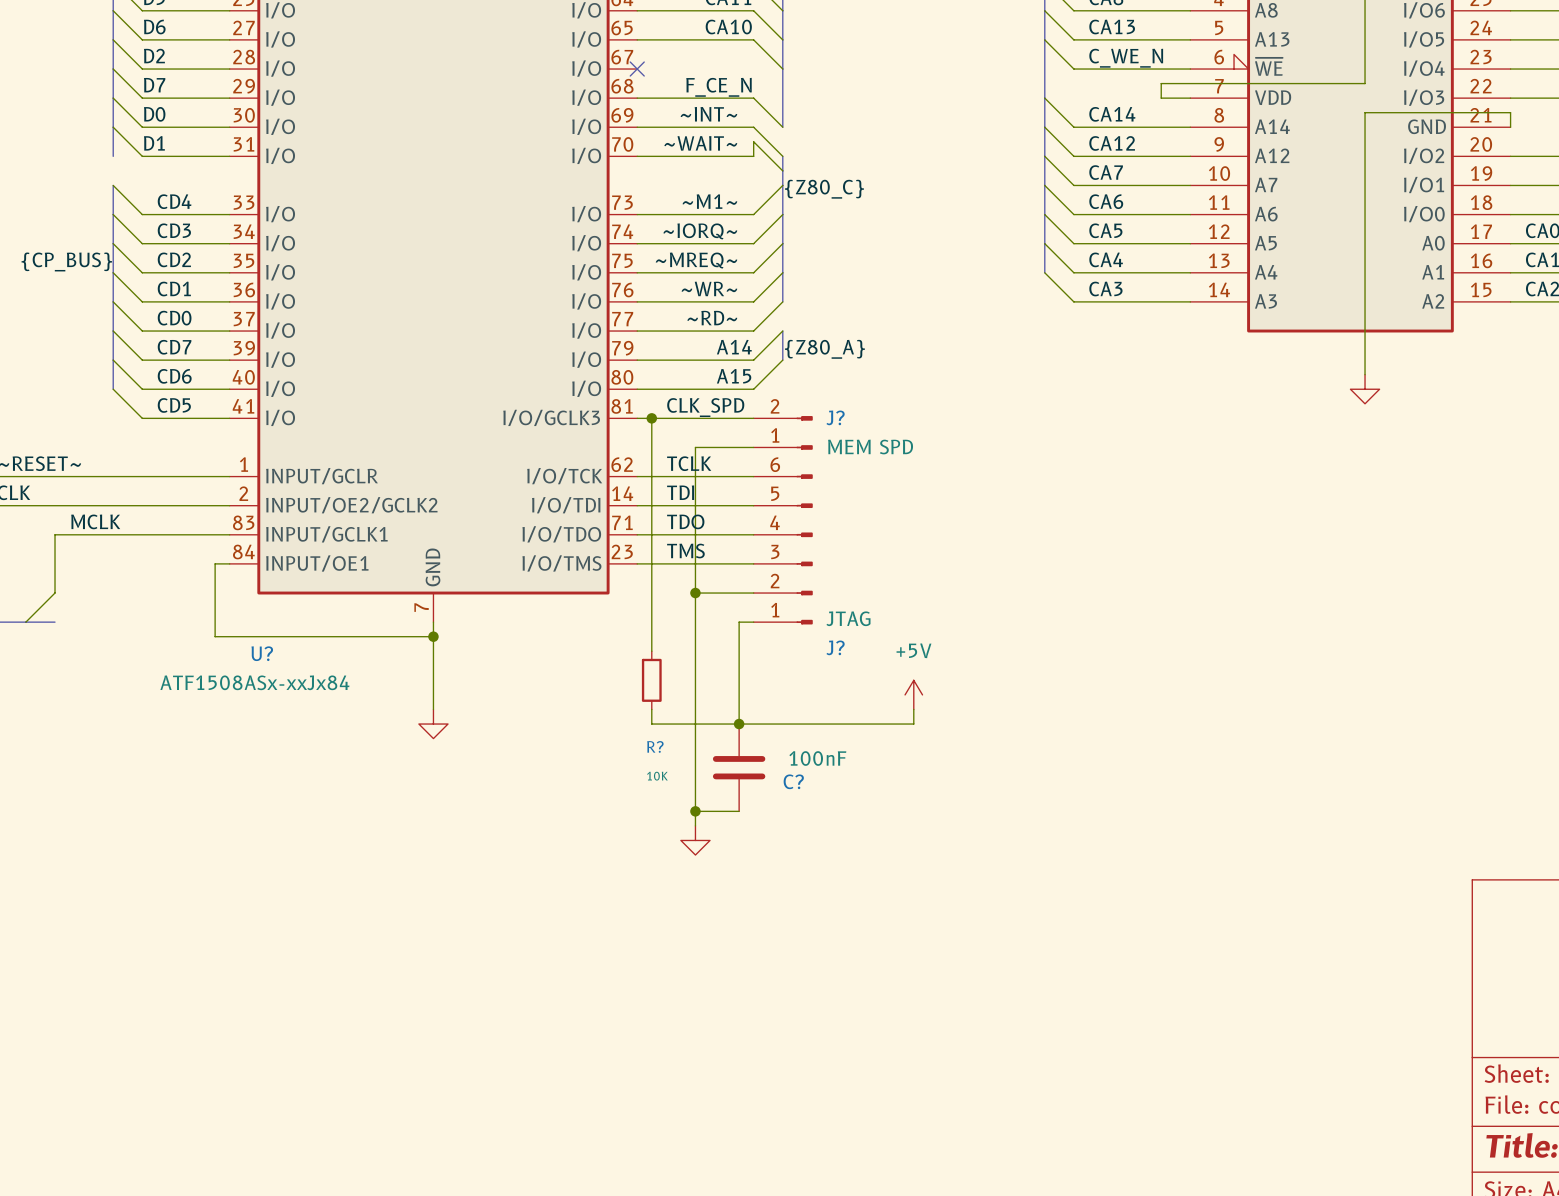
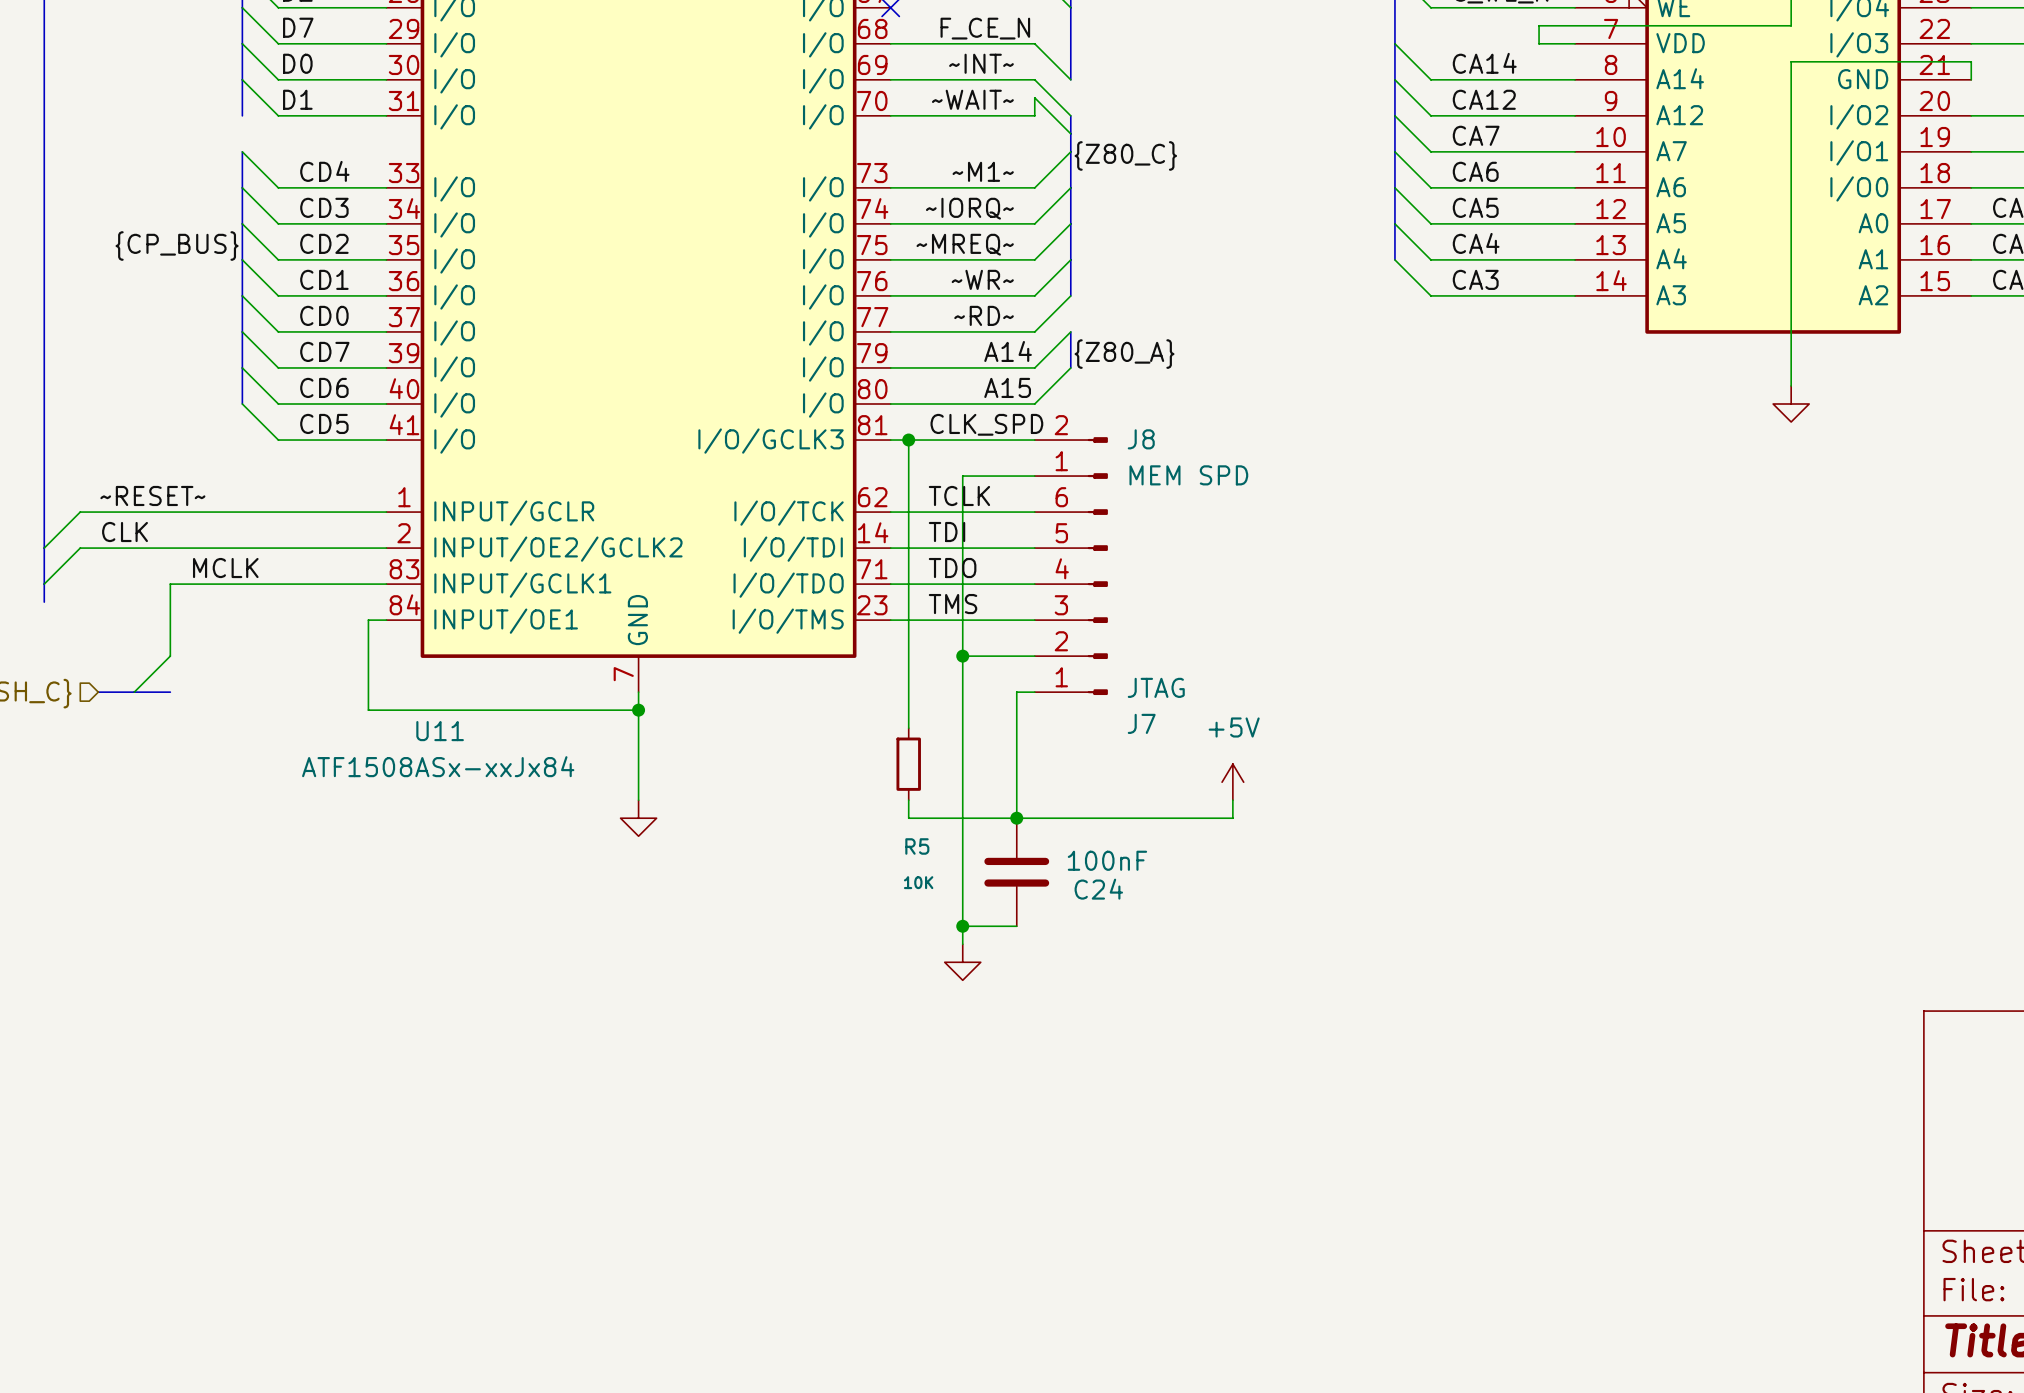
J? name: J? (835, 417) -> J8 (1141, 439)
J? name: J? (835, 647) -> J7 (1141, 723)
U? name: U? (262, 653) -> U11 (440, 731)
R? name: R? (655, 746) -> R5 (917, 846)
C? name: C? (793, 781) -> C24 (1098, 889)

